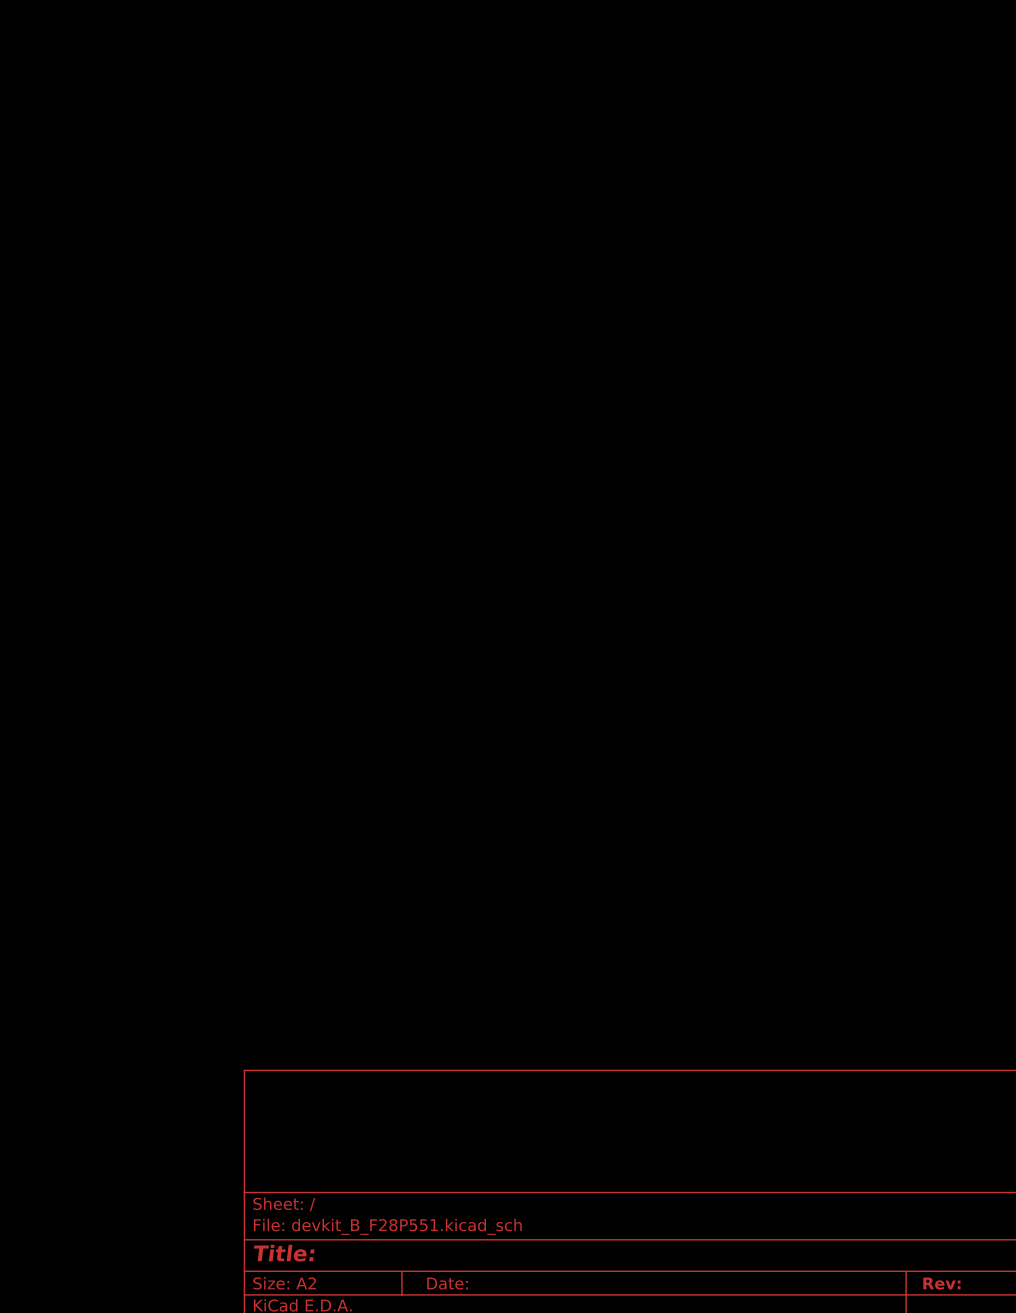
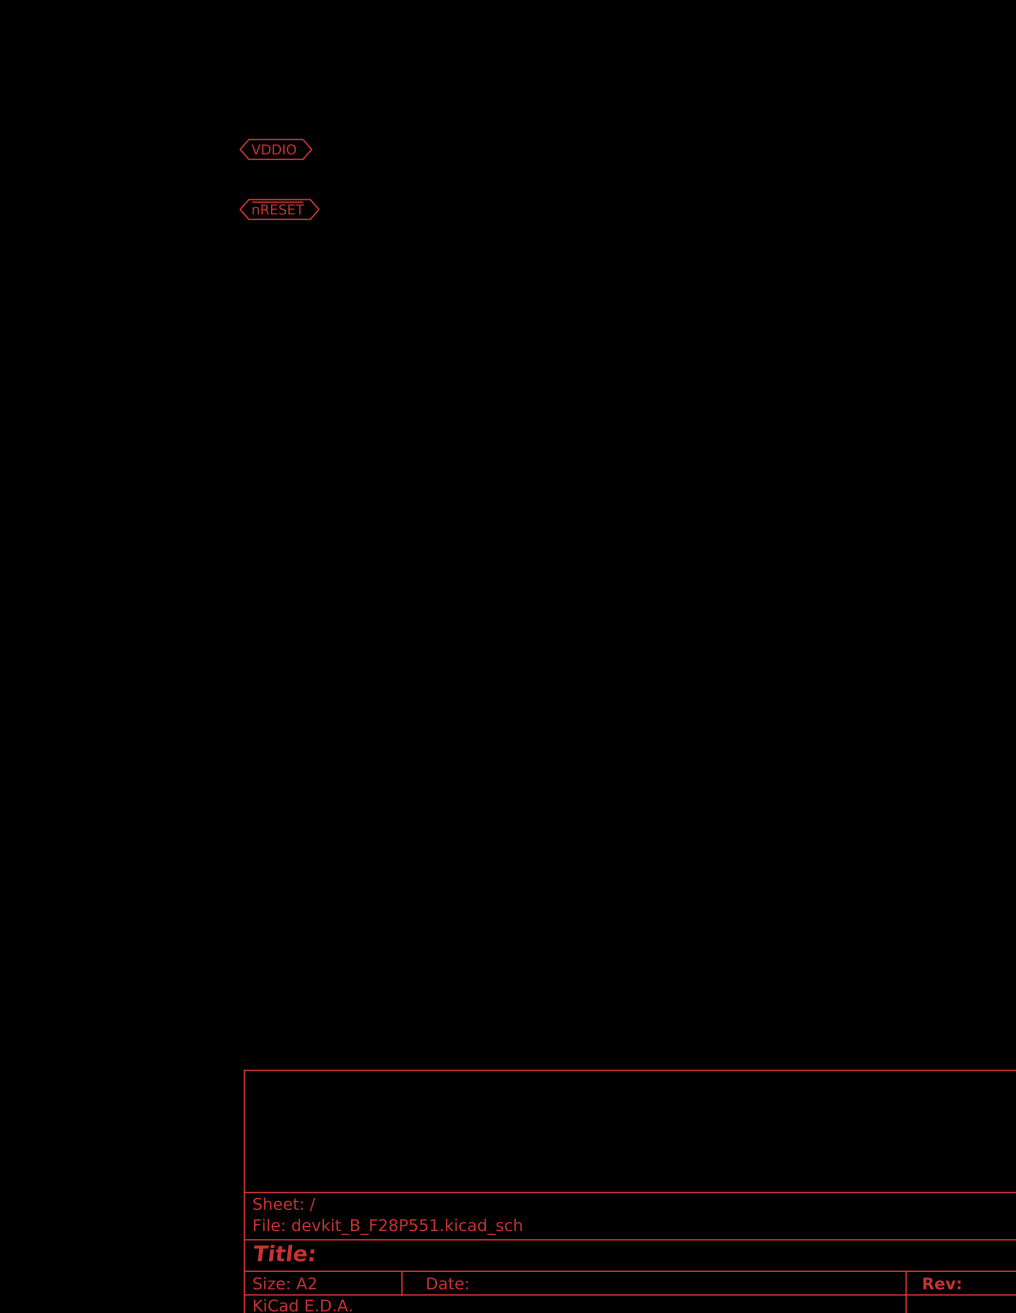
global label: none -> VDDIO (273, 149)
global label: none -> ~{nRESET} (278, 208)

